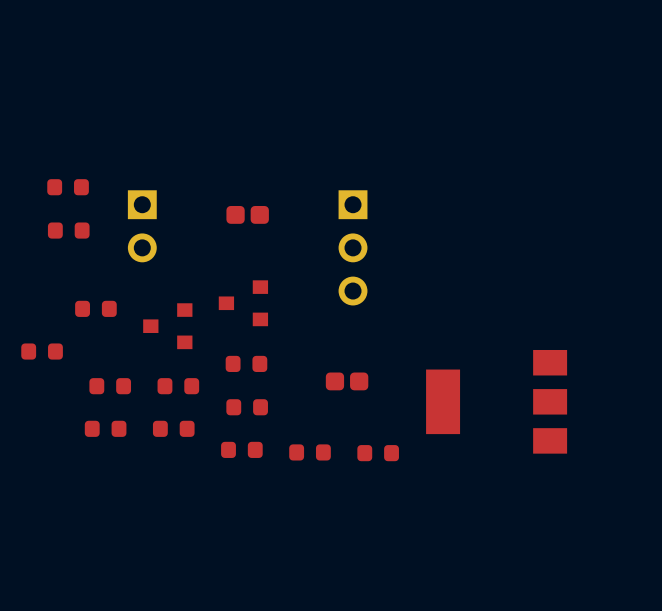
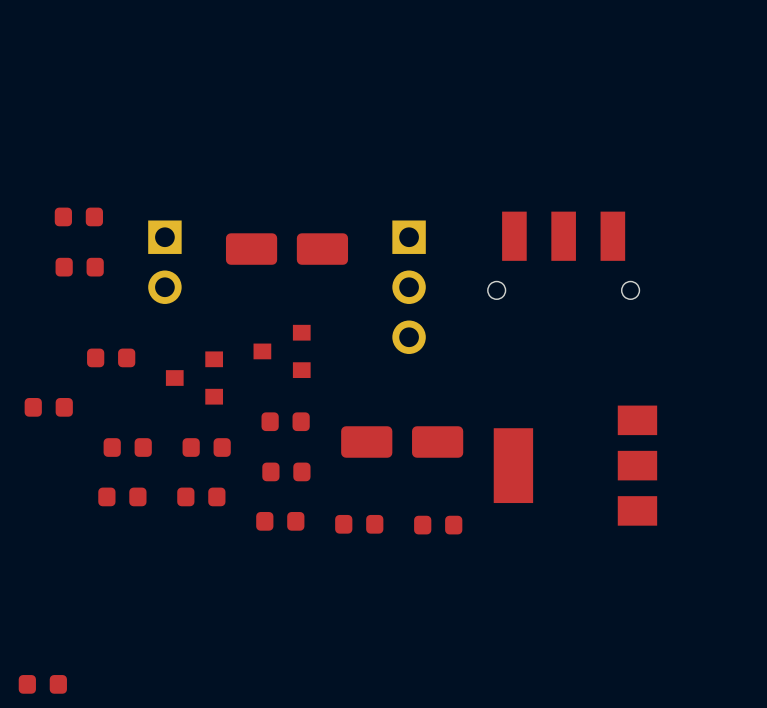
part footprint: [226, 205, 269, 224] -> [225, 233, 349, 265]
part: none -> (563, 255)
part footprint: [325, 372, 369, 391] -> [341, 426, 464, 458]
part: none -> (42, 684)

